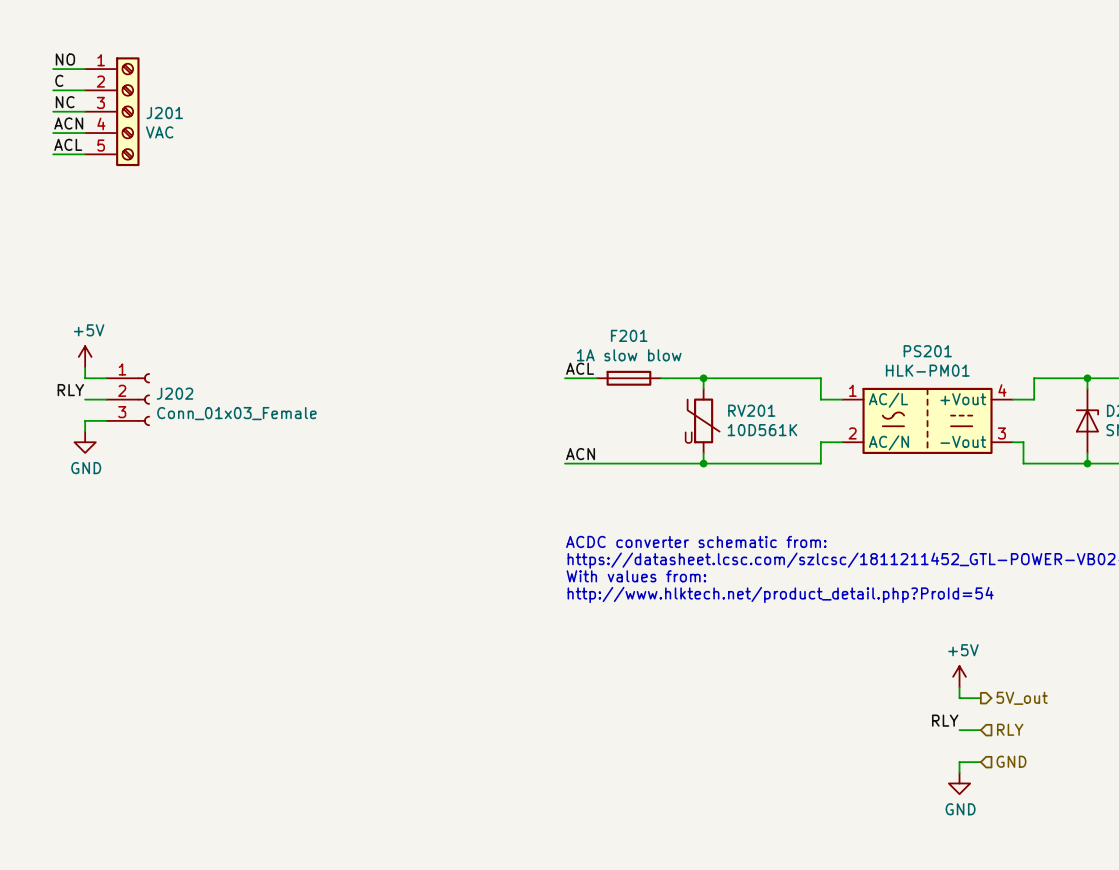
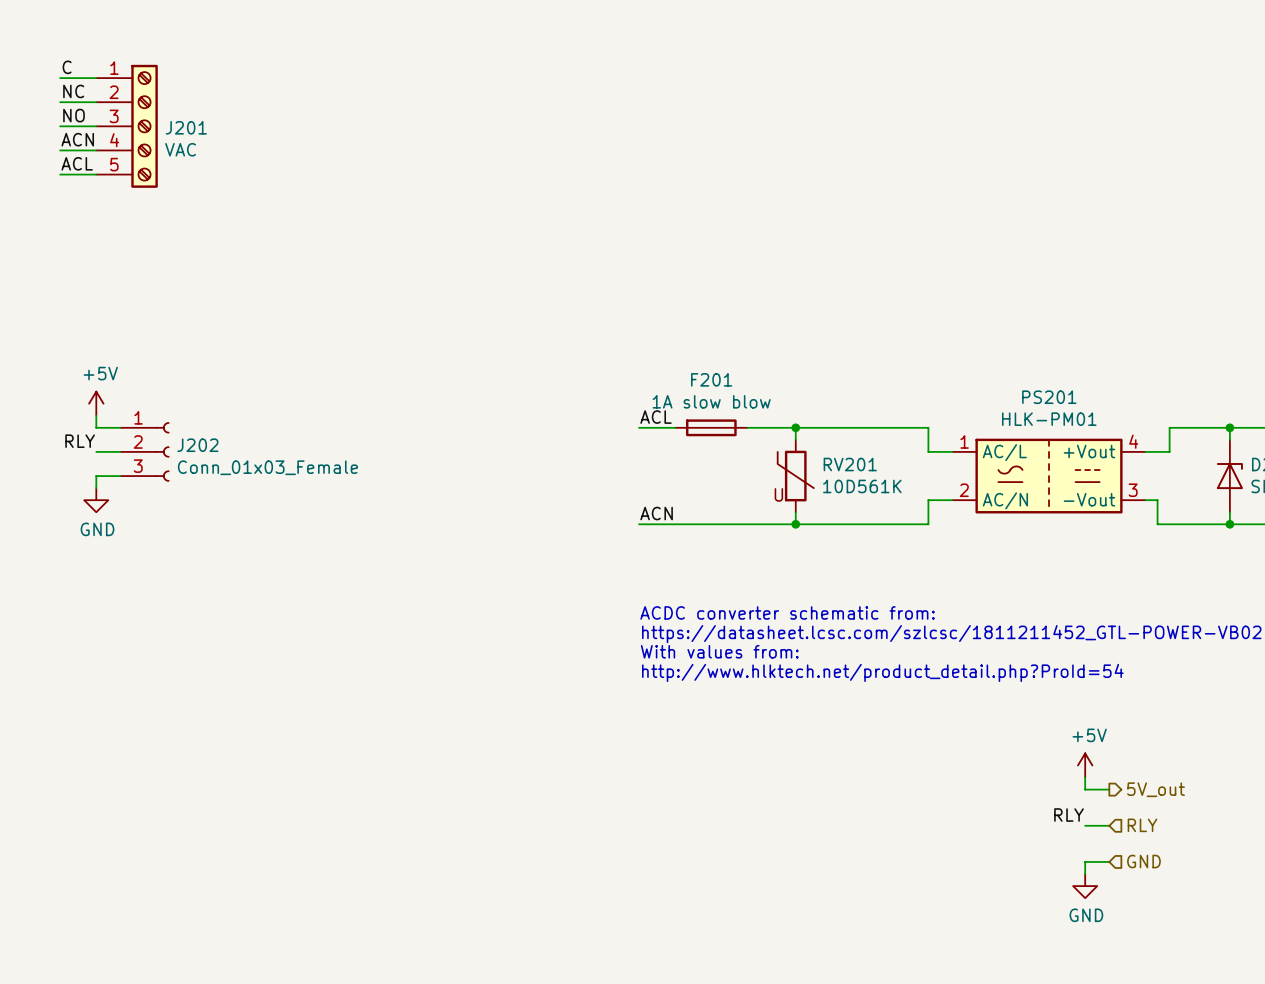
label: NO (65, 59) -> C (67, 67)
label: C (59, 80) -> NC (73, 91)
label: NC (65, 102) -> NO (74, 115)

